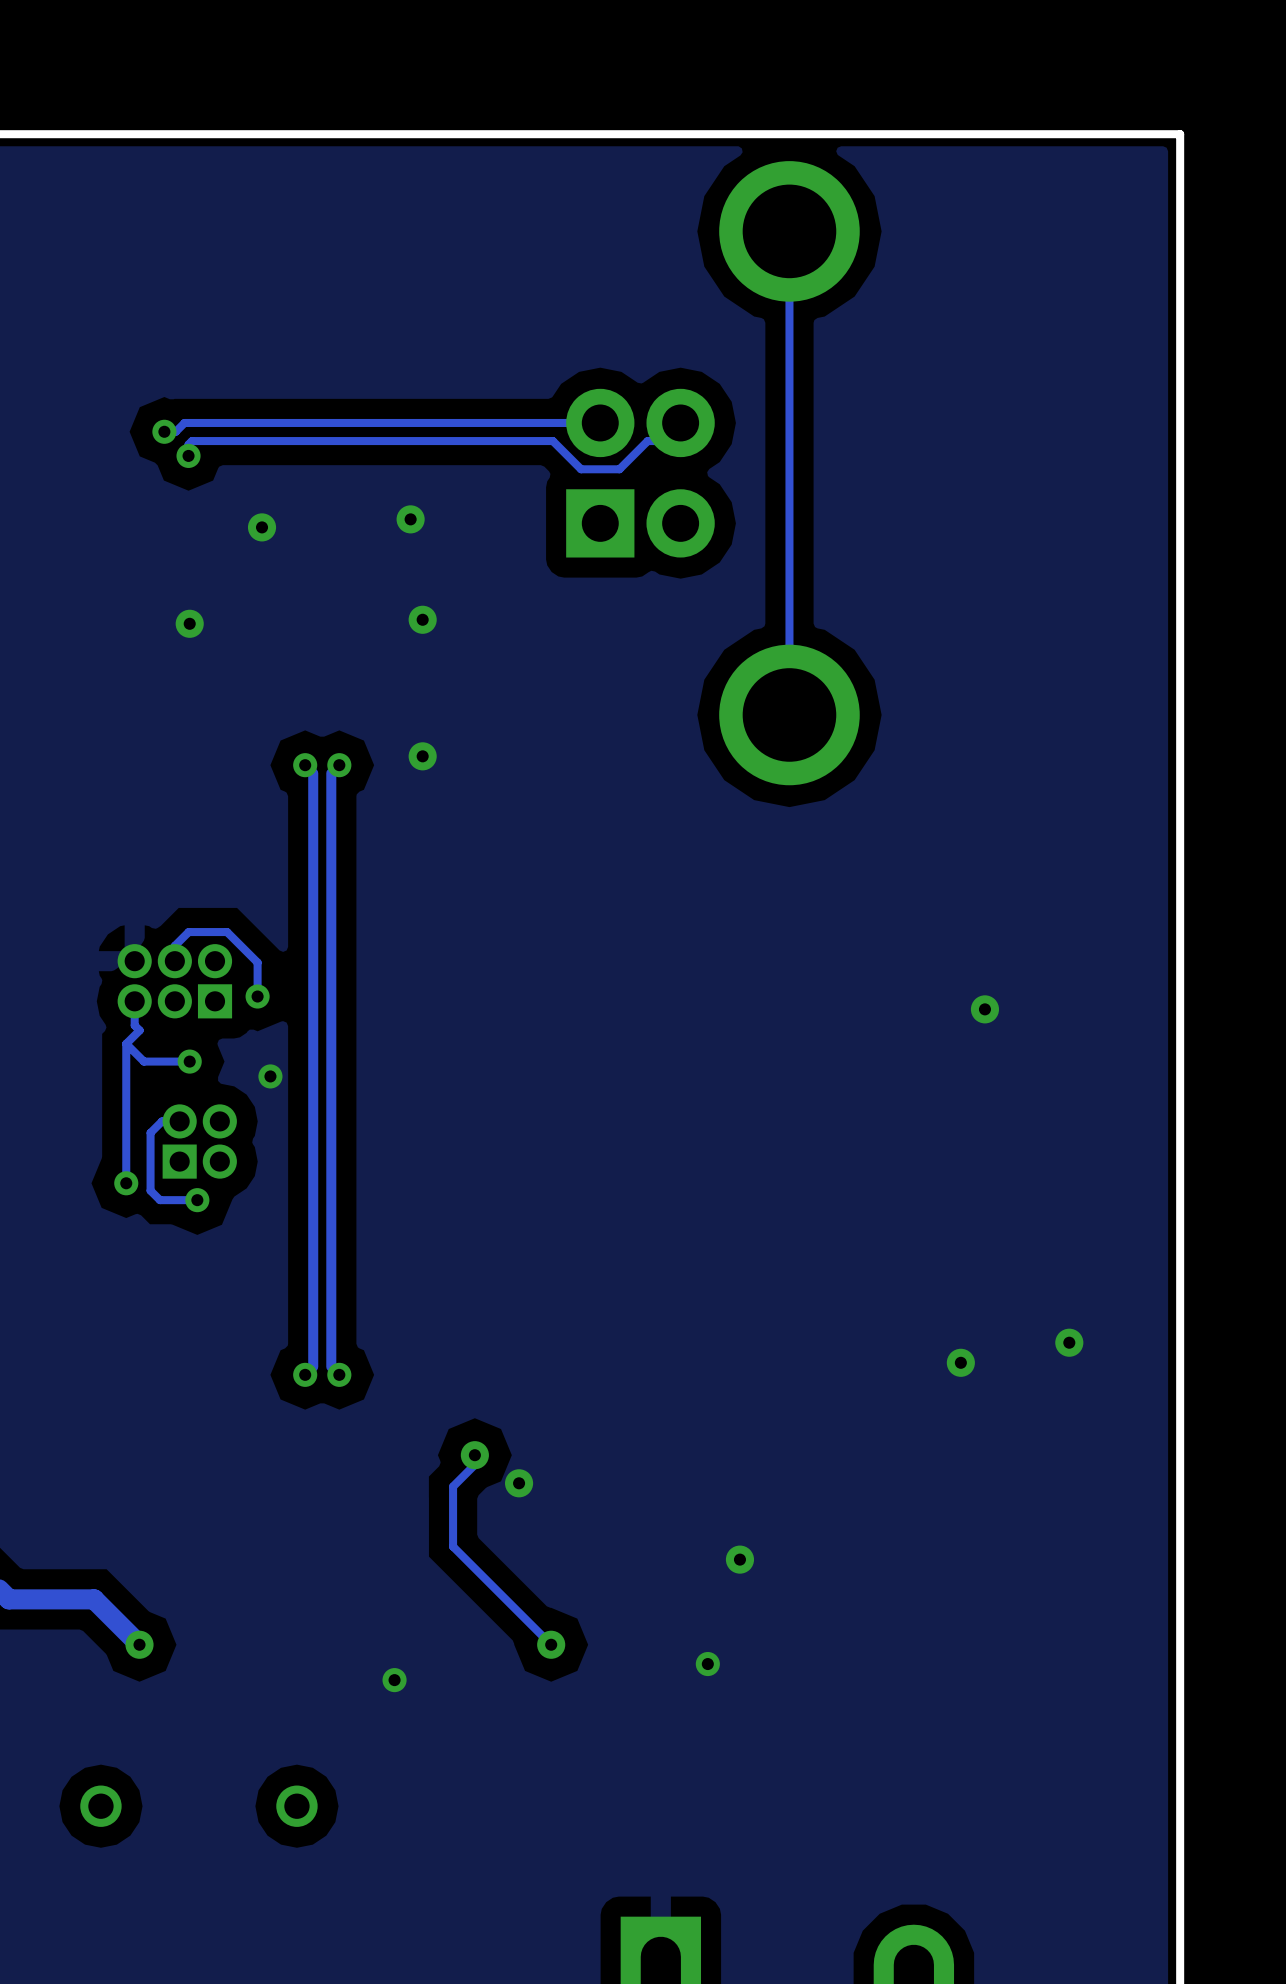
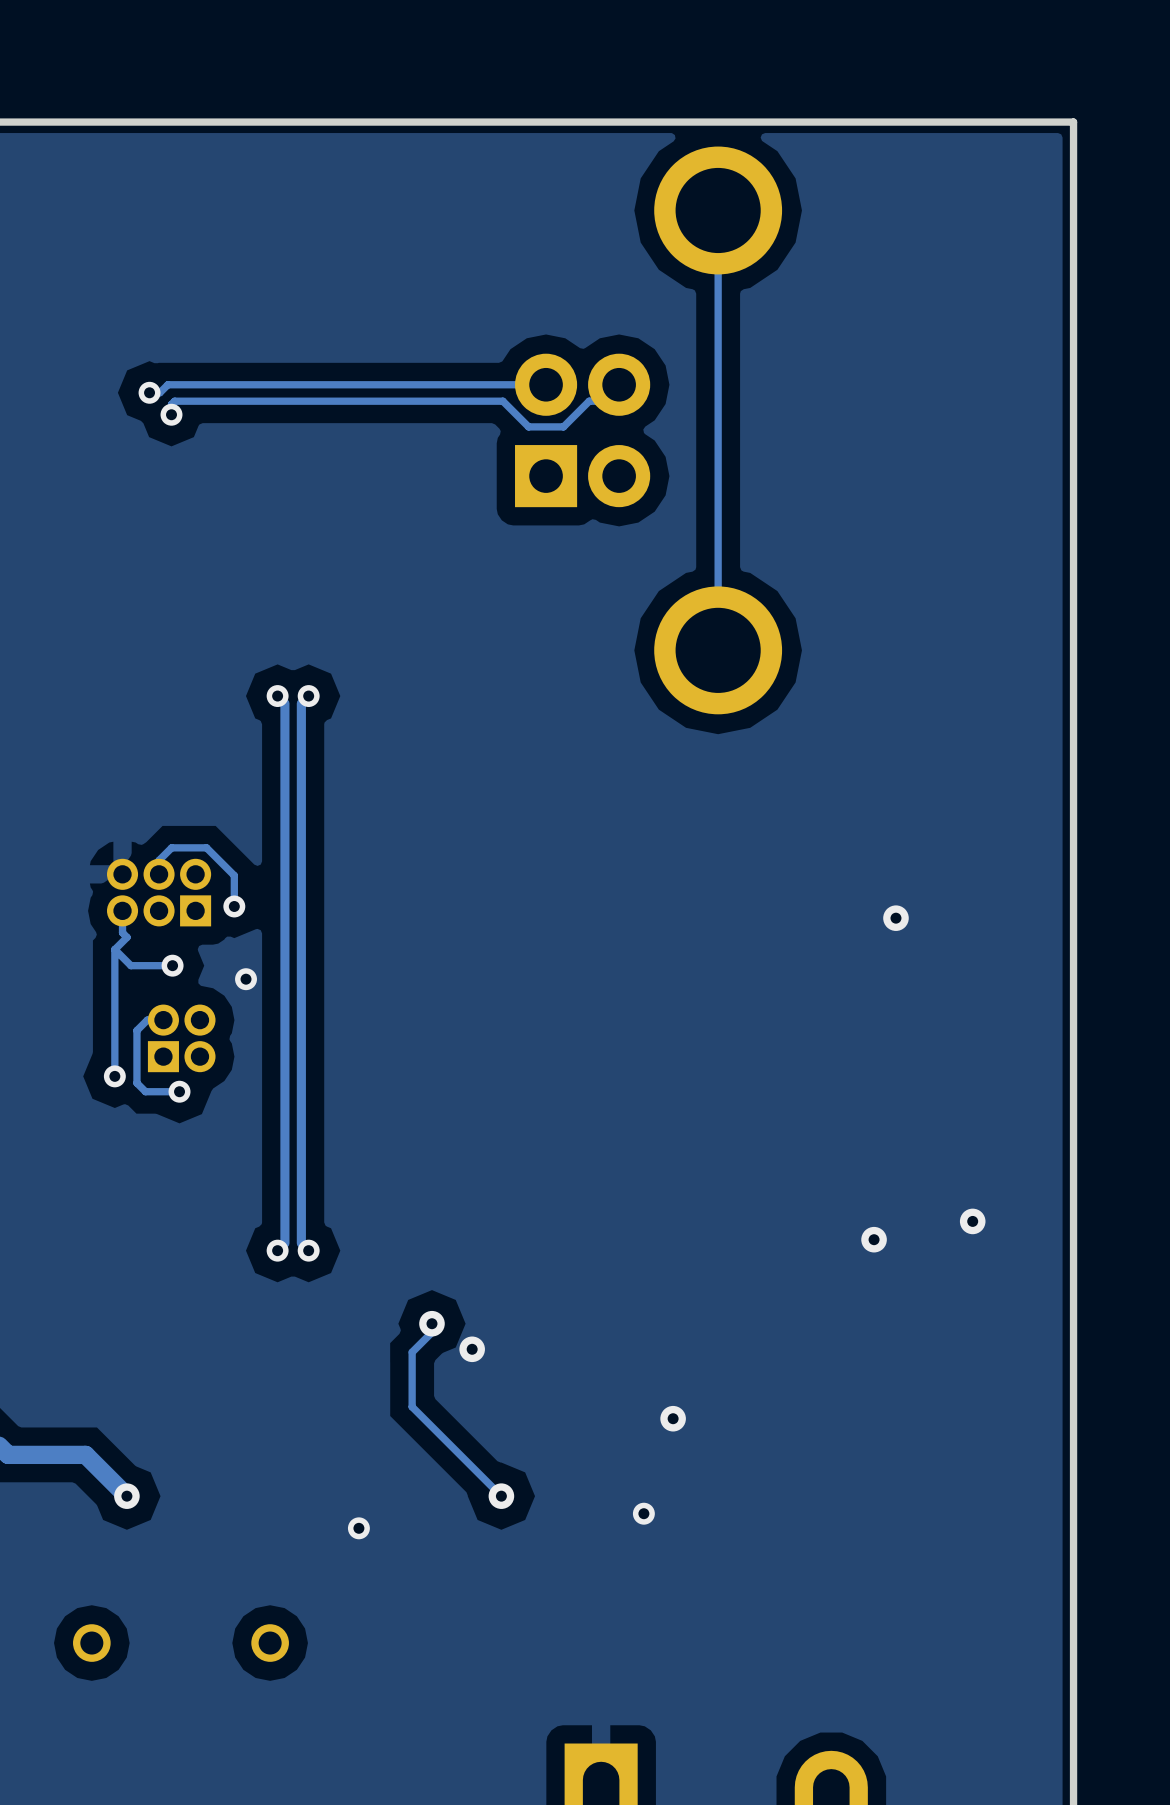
via: (410, 519) -> none
via: (262, 527) -> none
via: (422, 619) -> none
via: (189, 623) -> none
via: (422, 756) -> none

